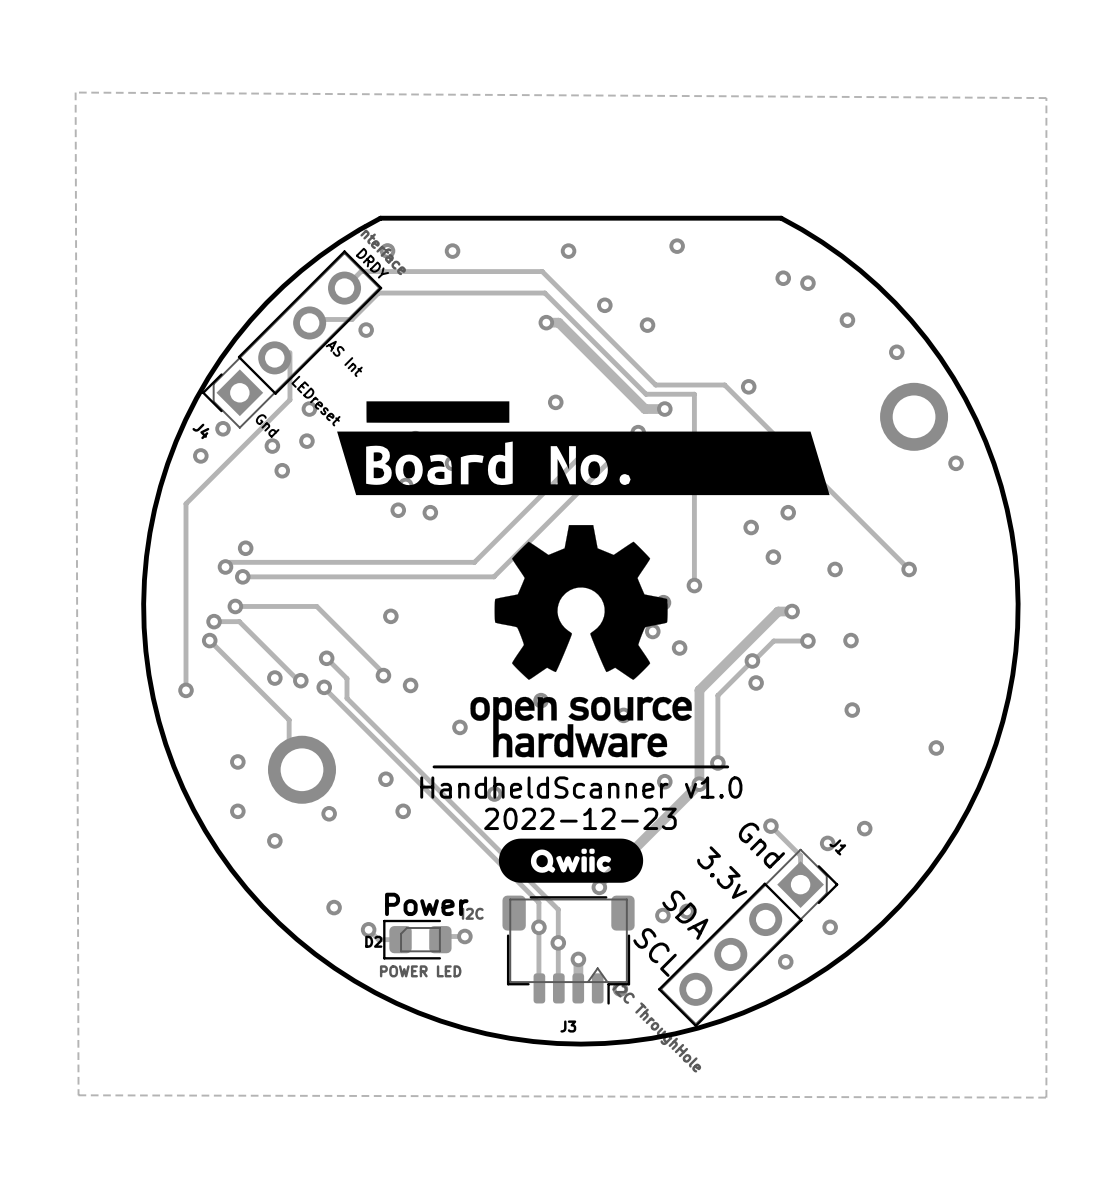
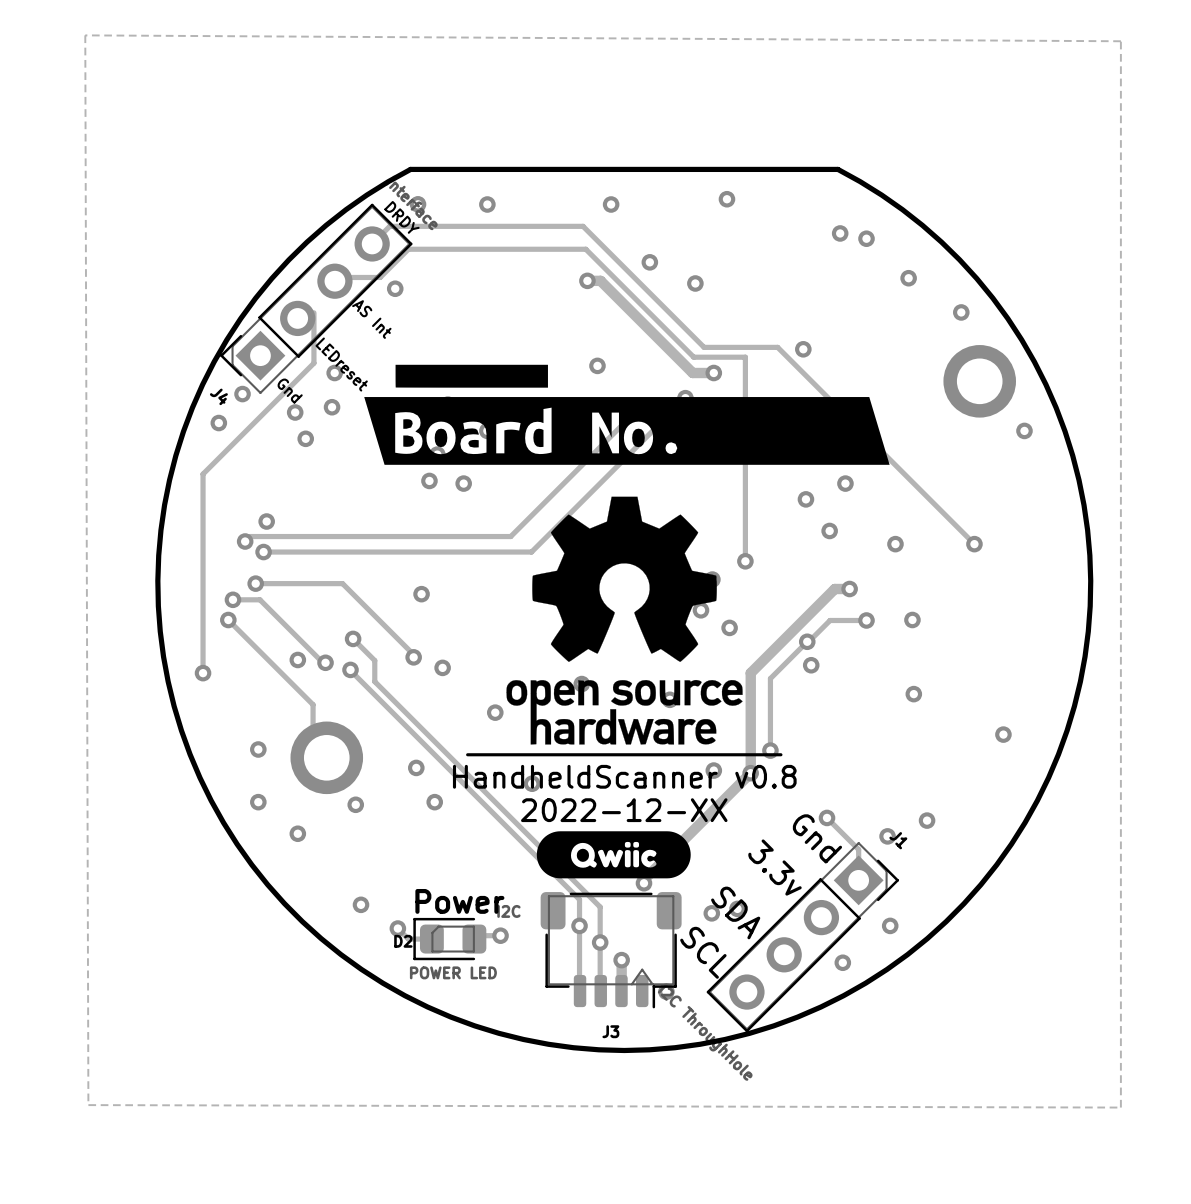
text: HandheldScanner v1.0 (581, 787) -> HandheldScanner v0.8 (624, 776)
text: 2022-12-23 (580, 818) -> 2022-12-XX (624, 810)

